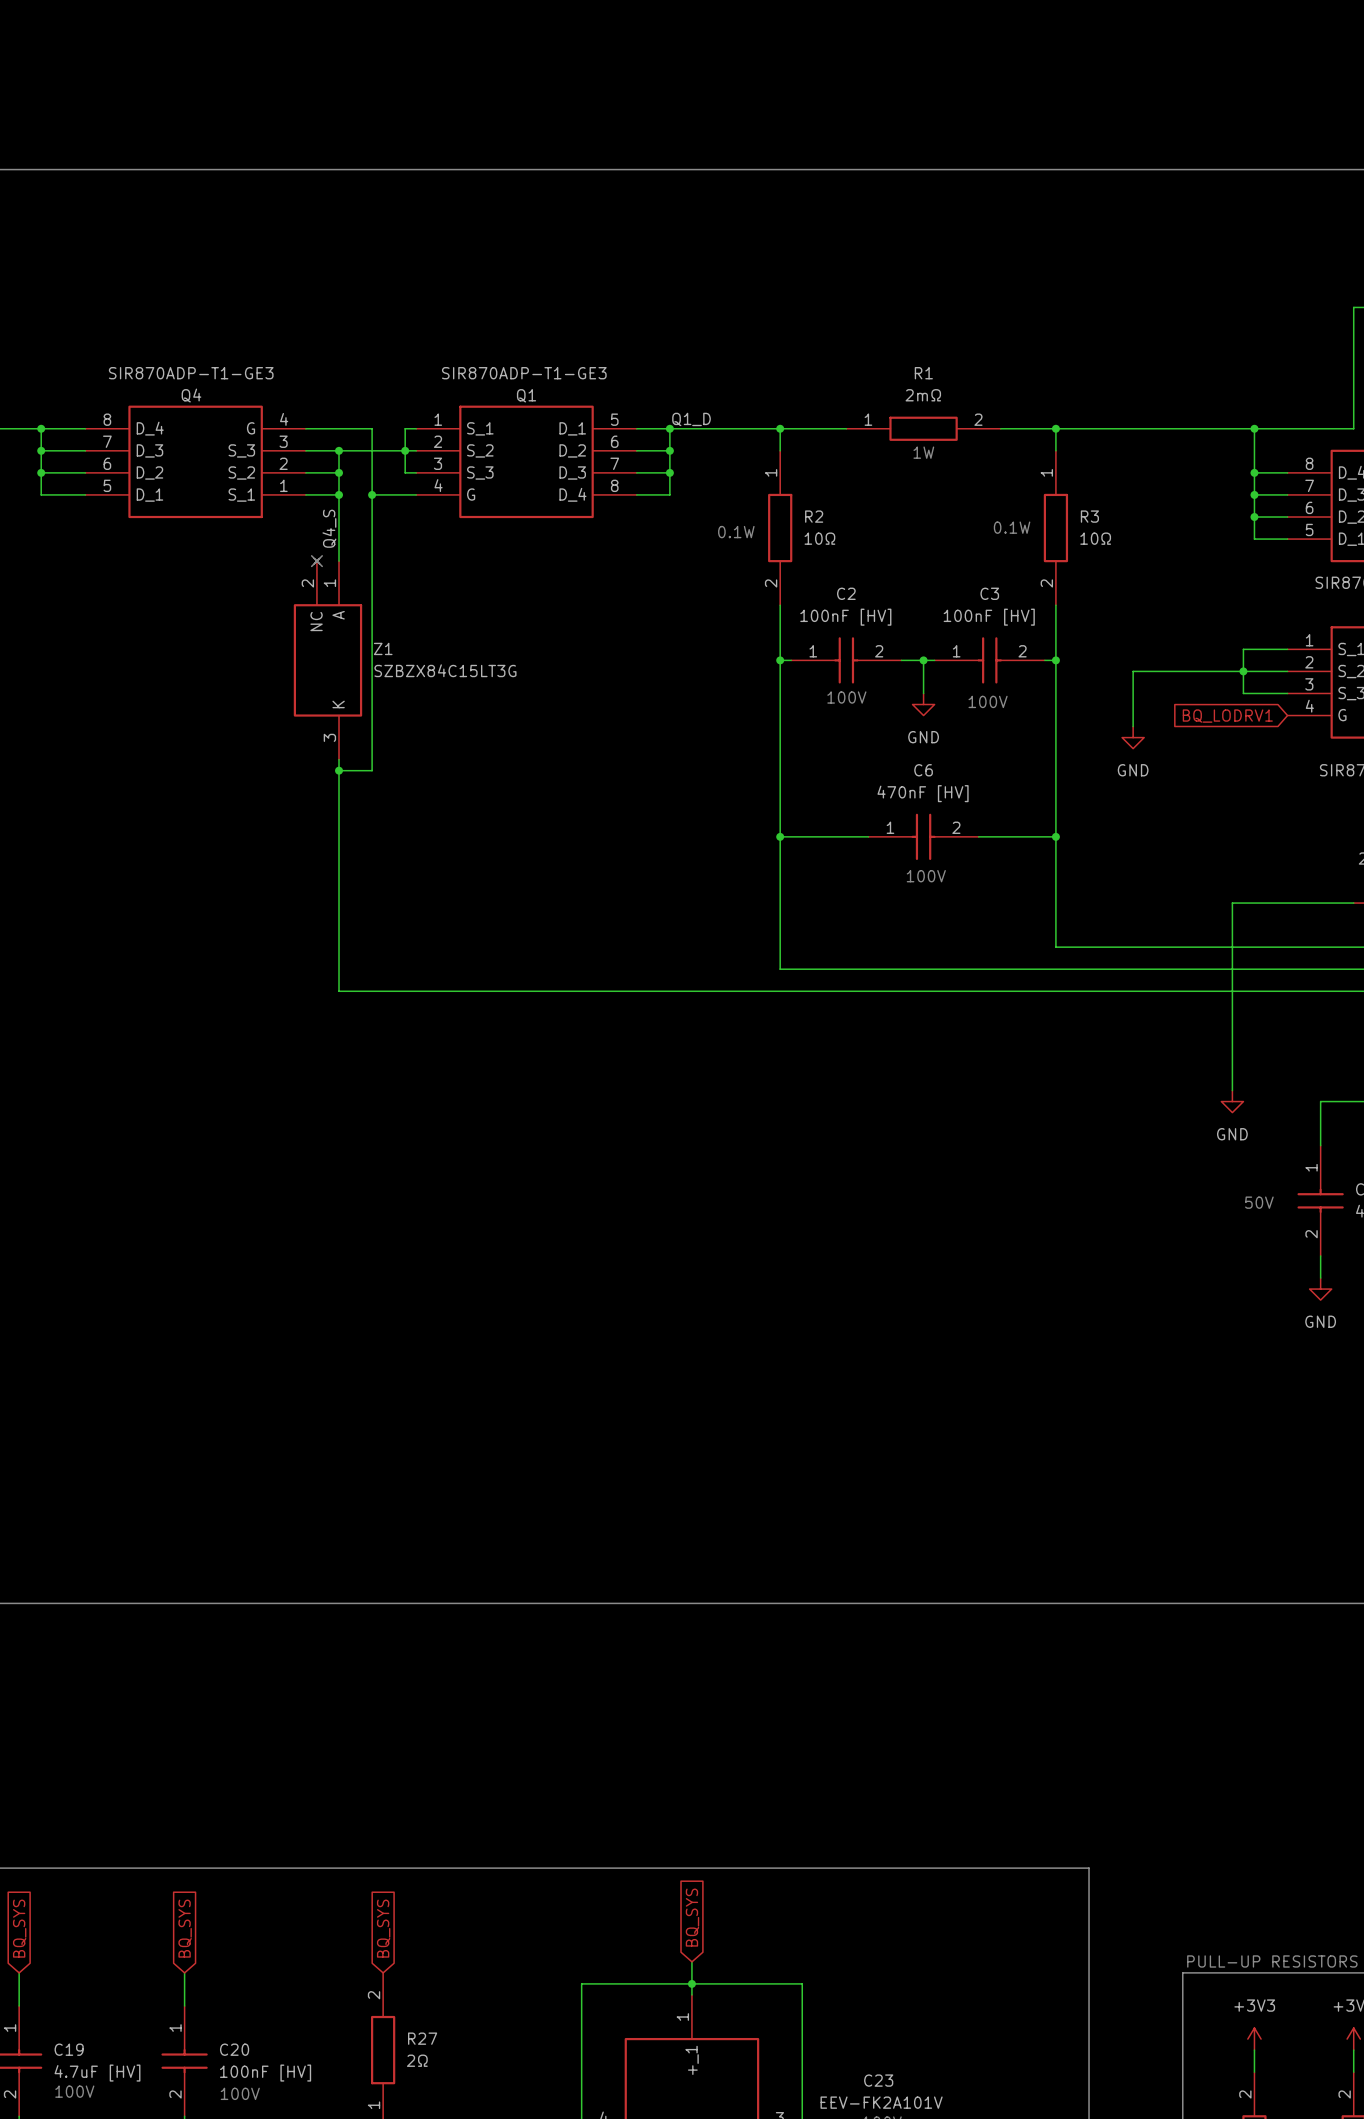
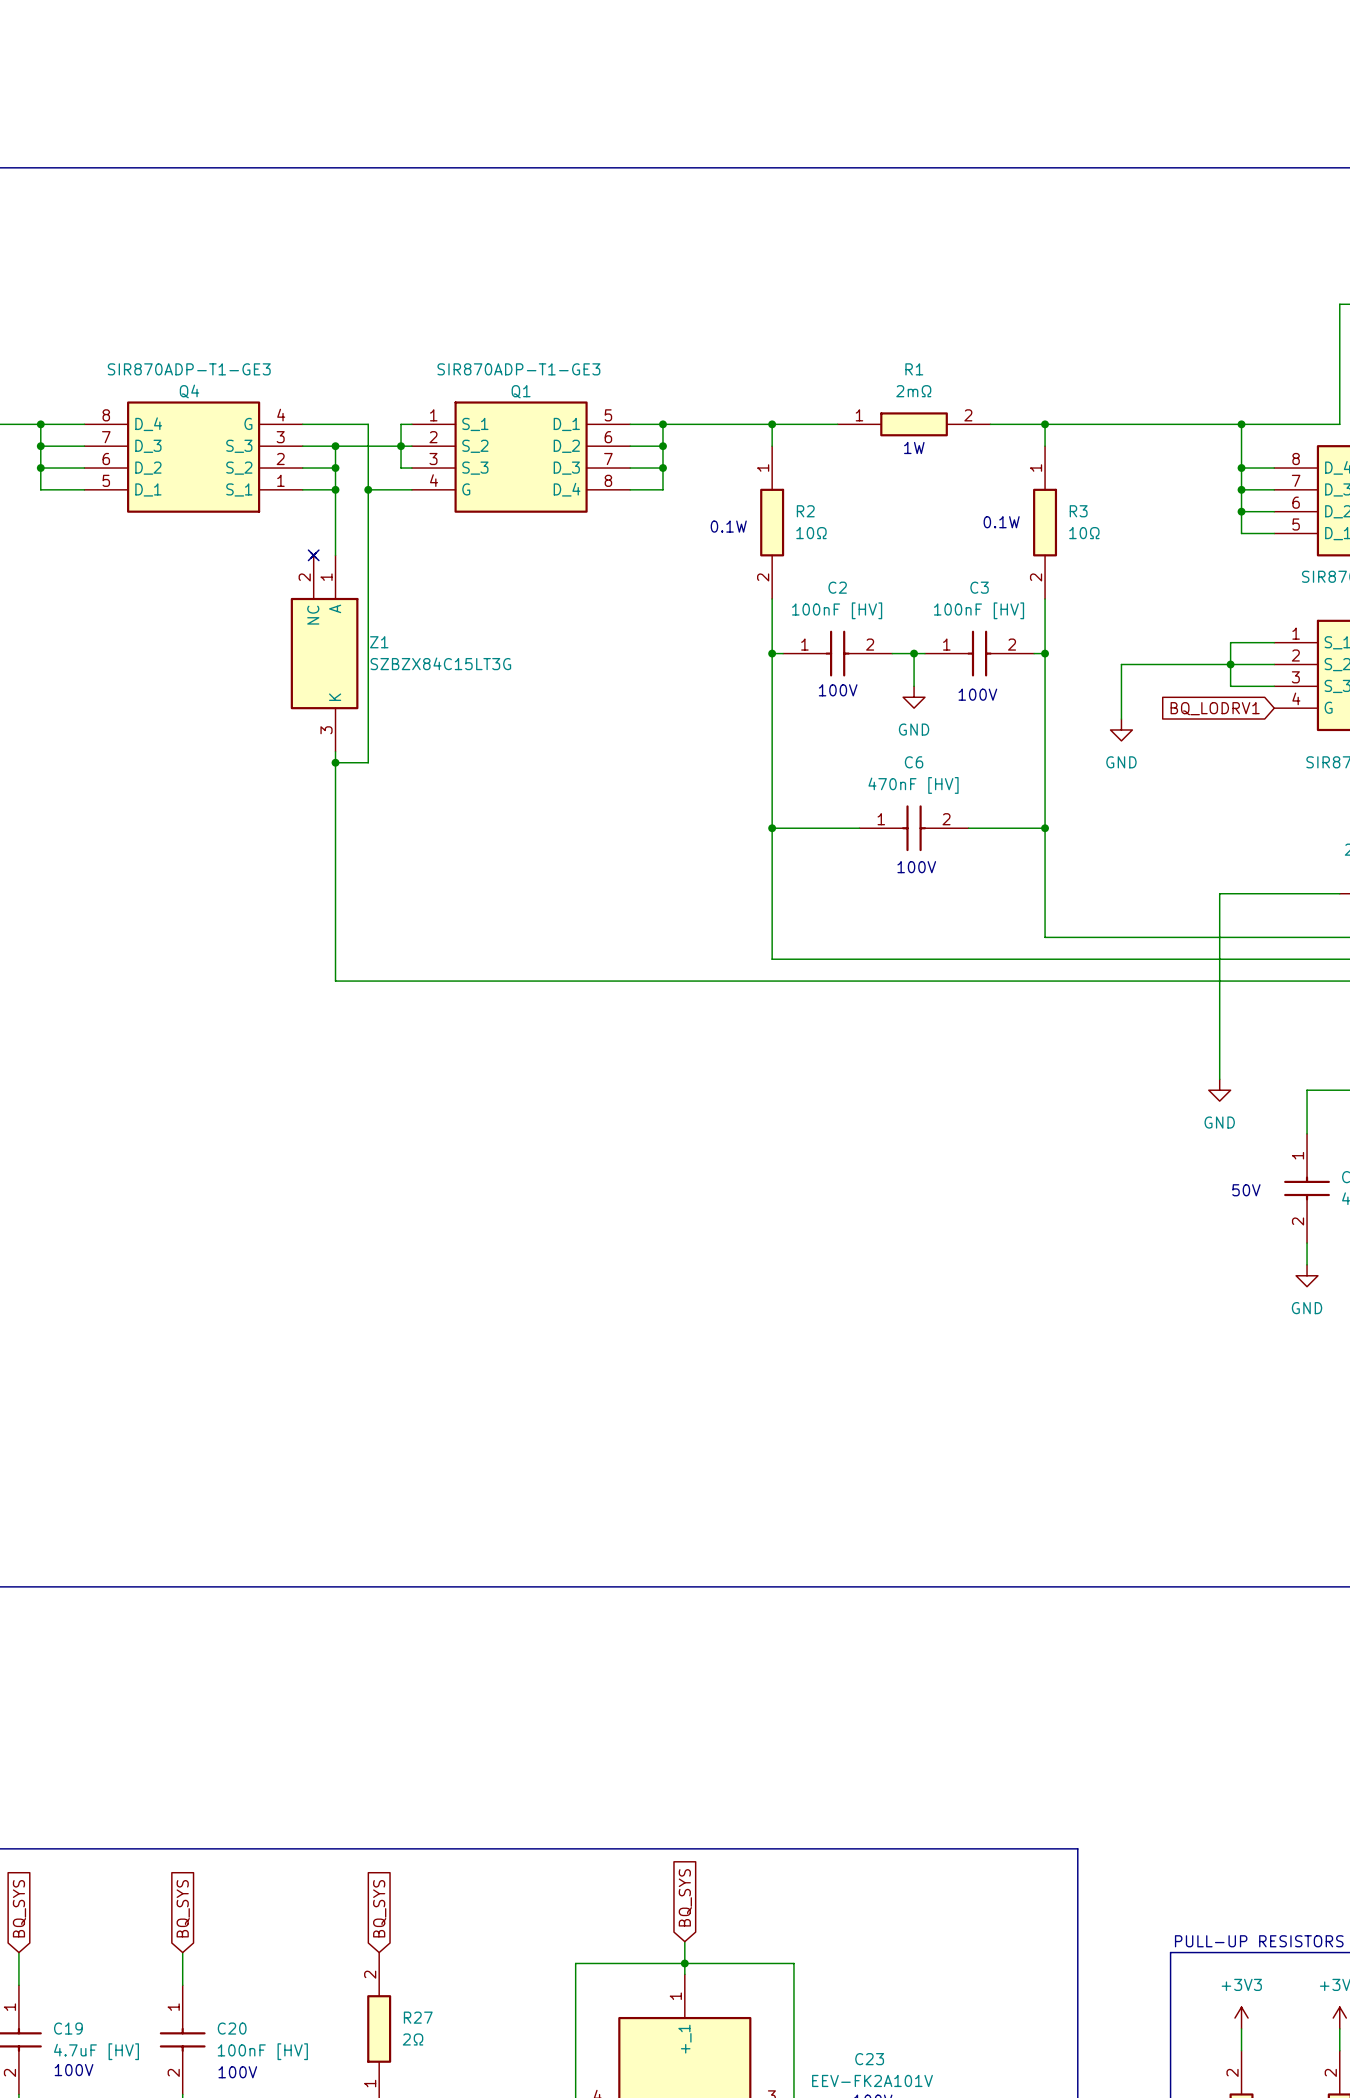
label: Q1_D (691, 419) -> none
label: Q4_S (329, 528) -> none

